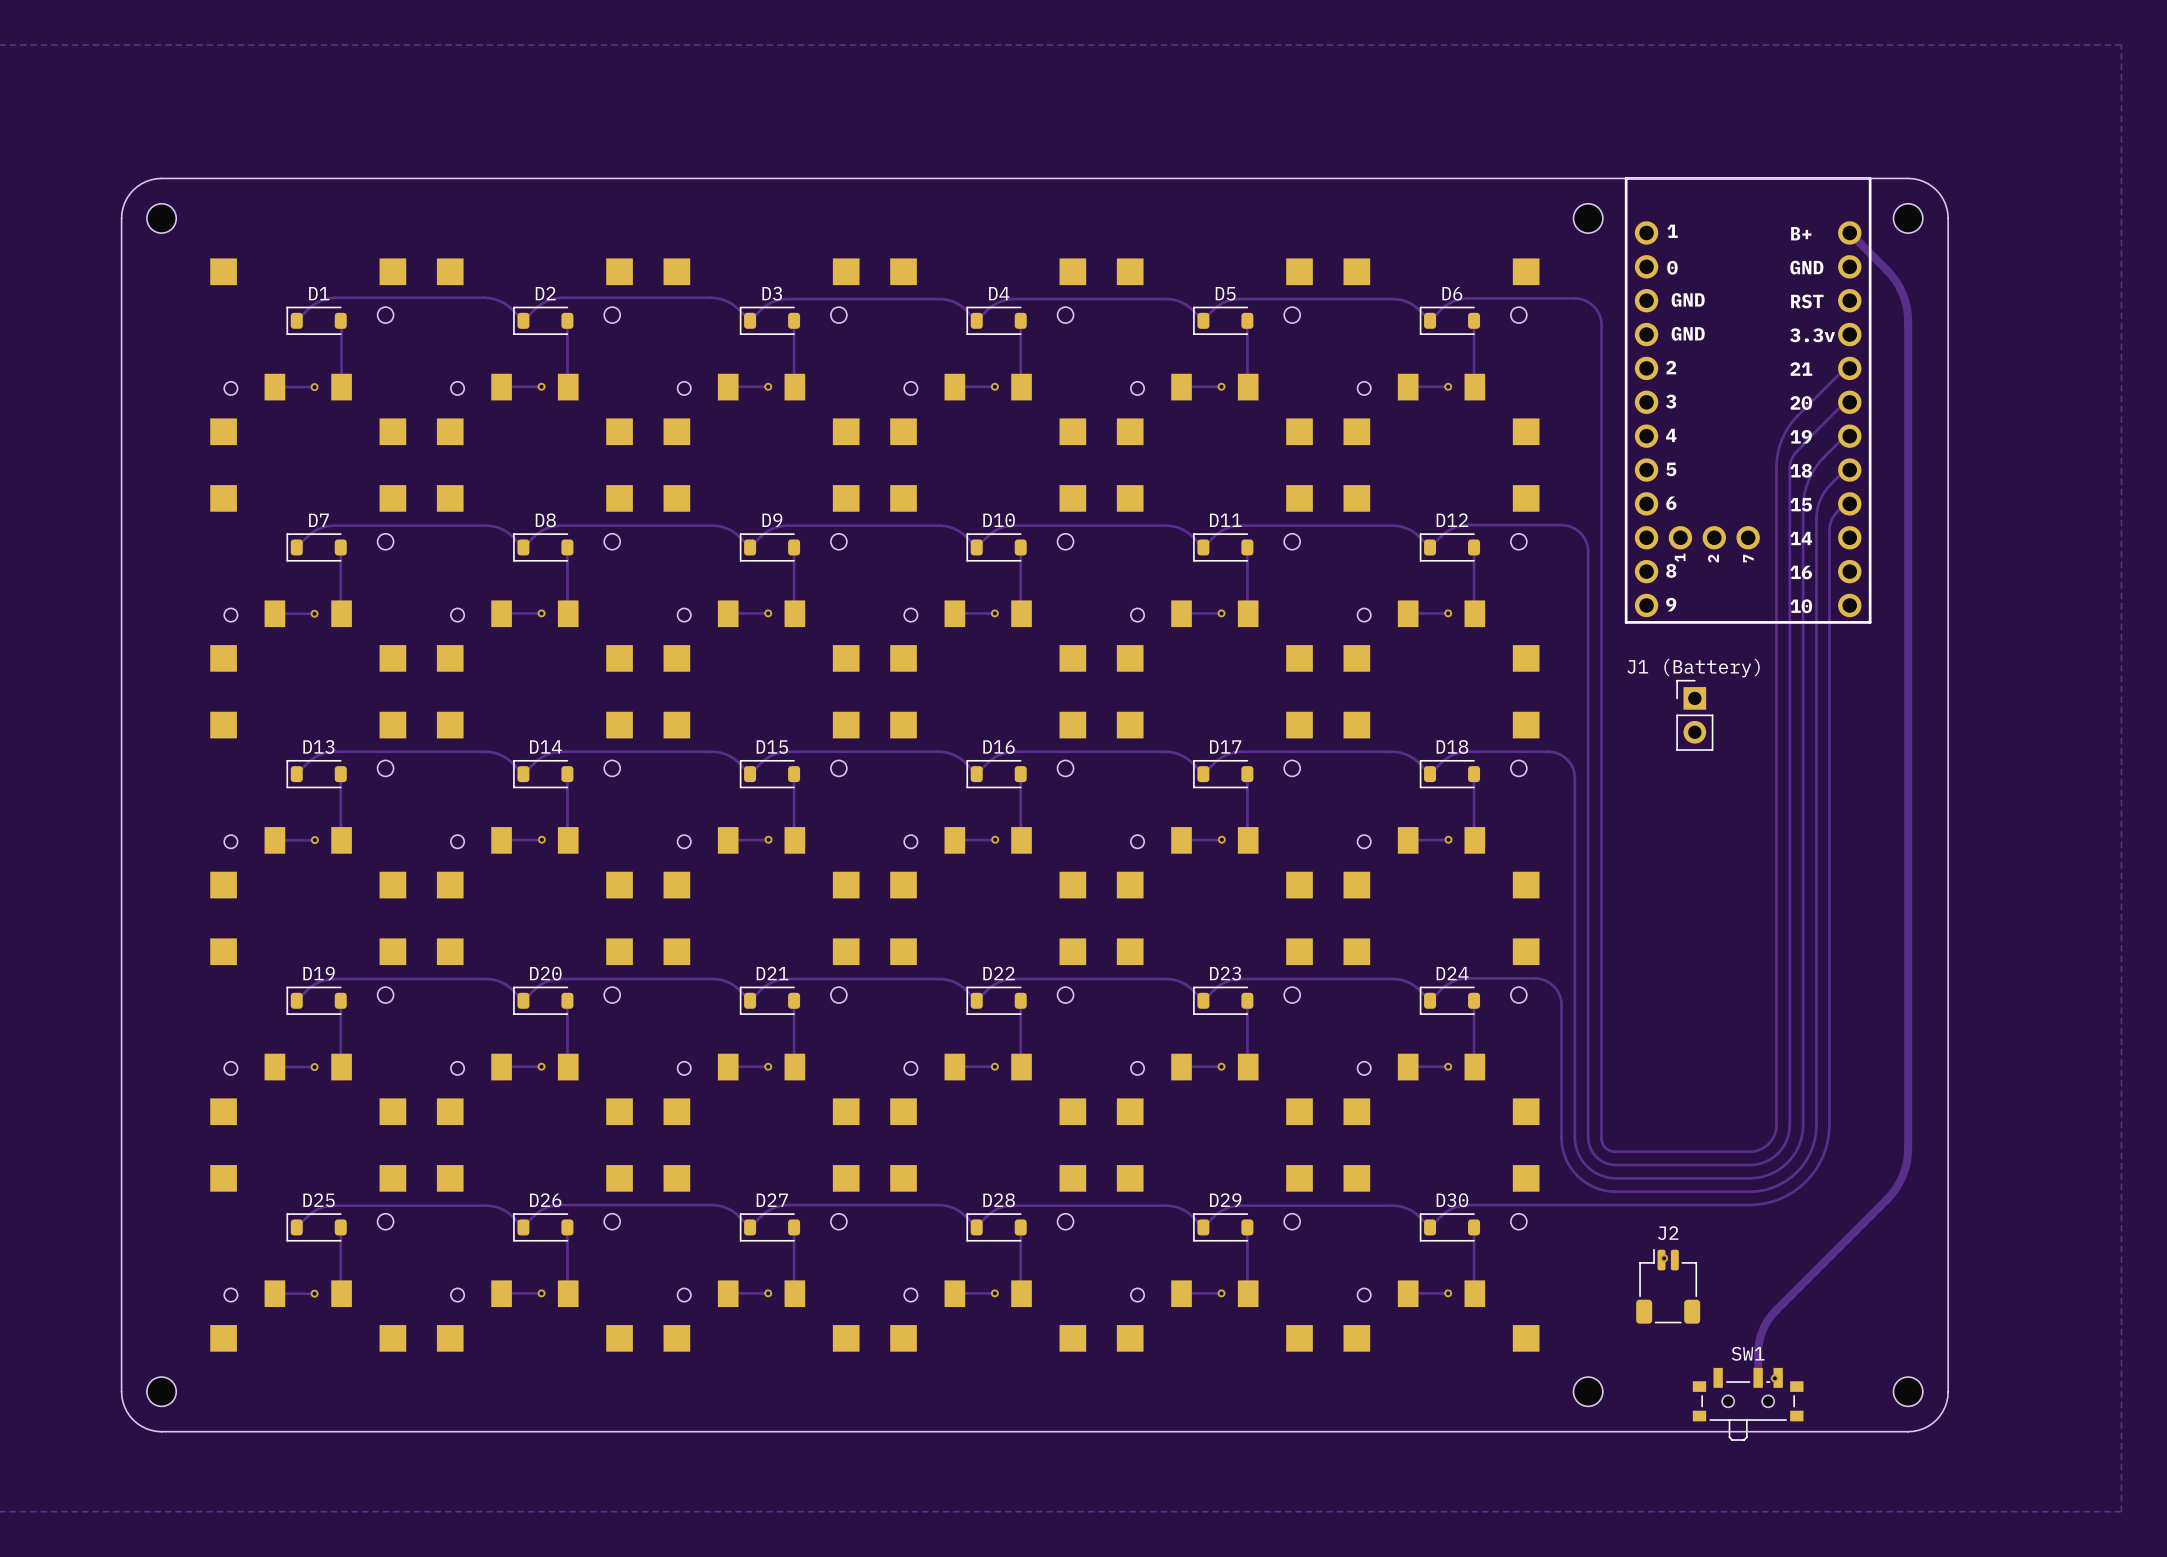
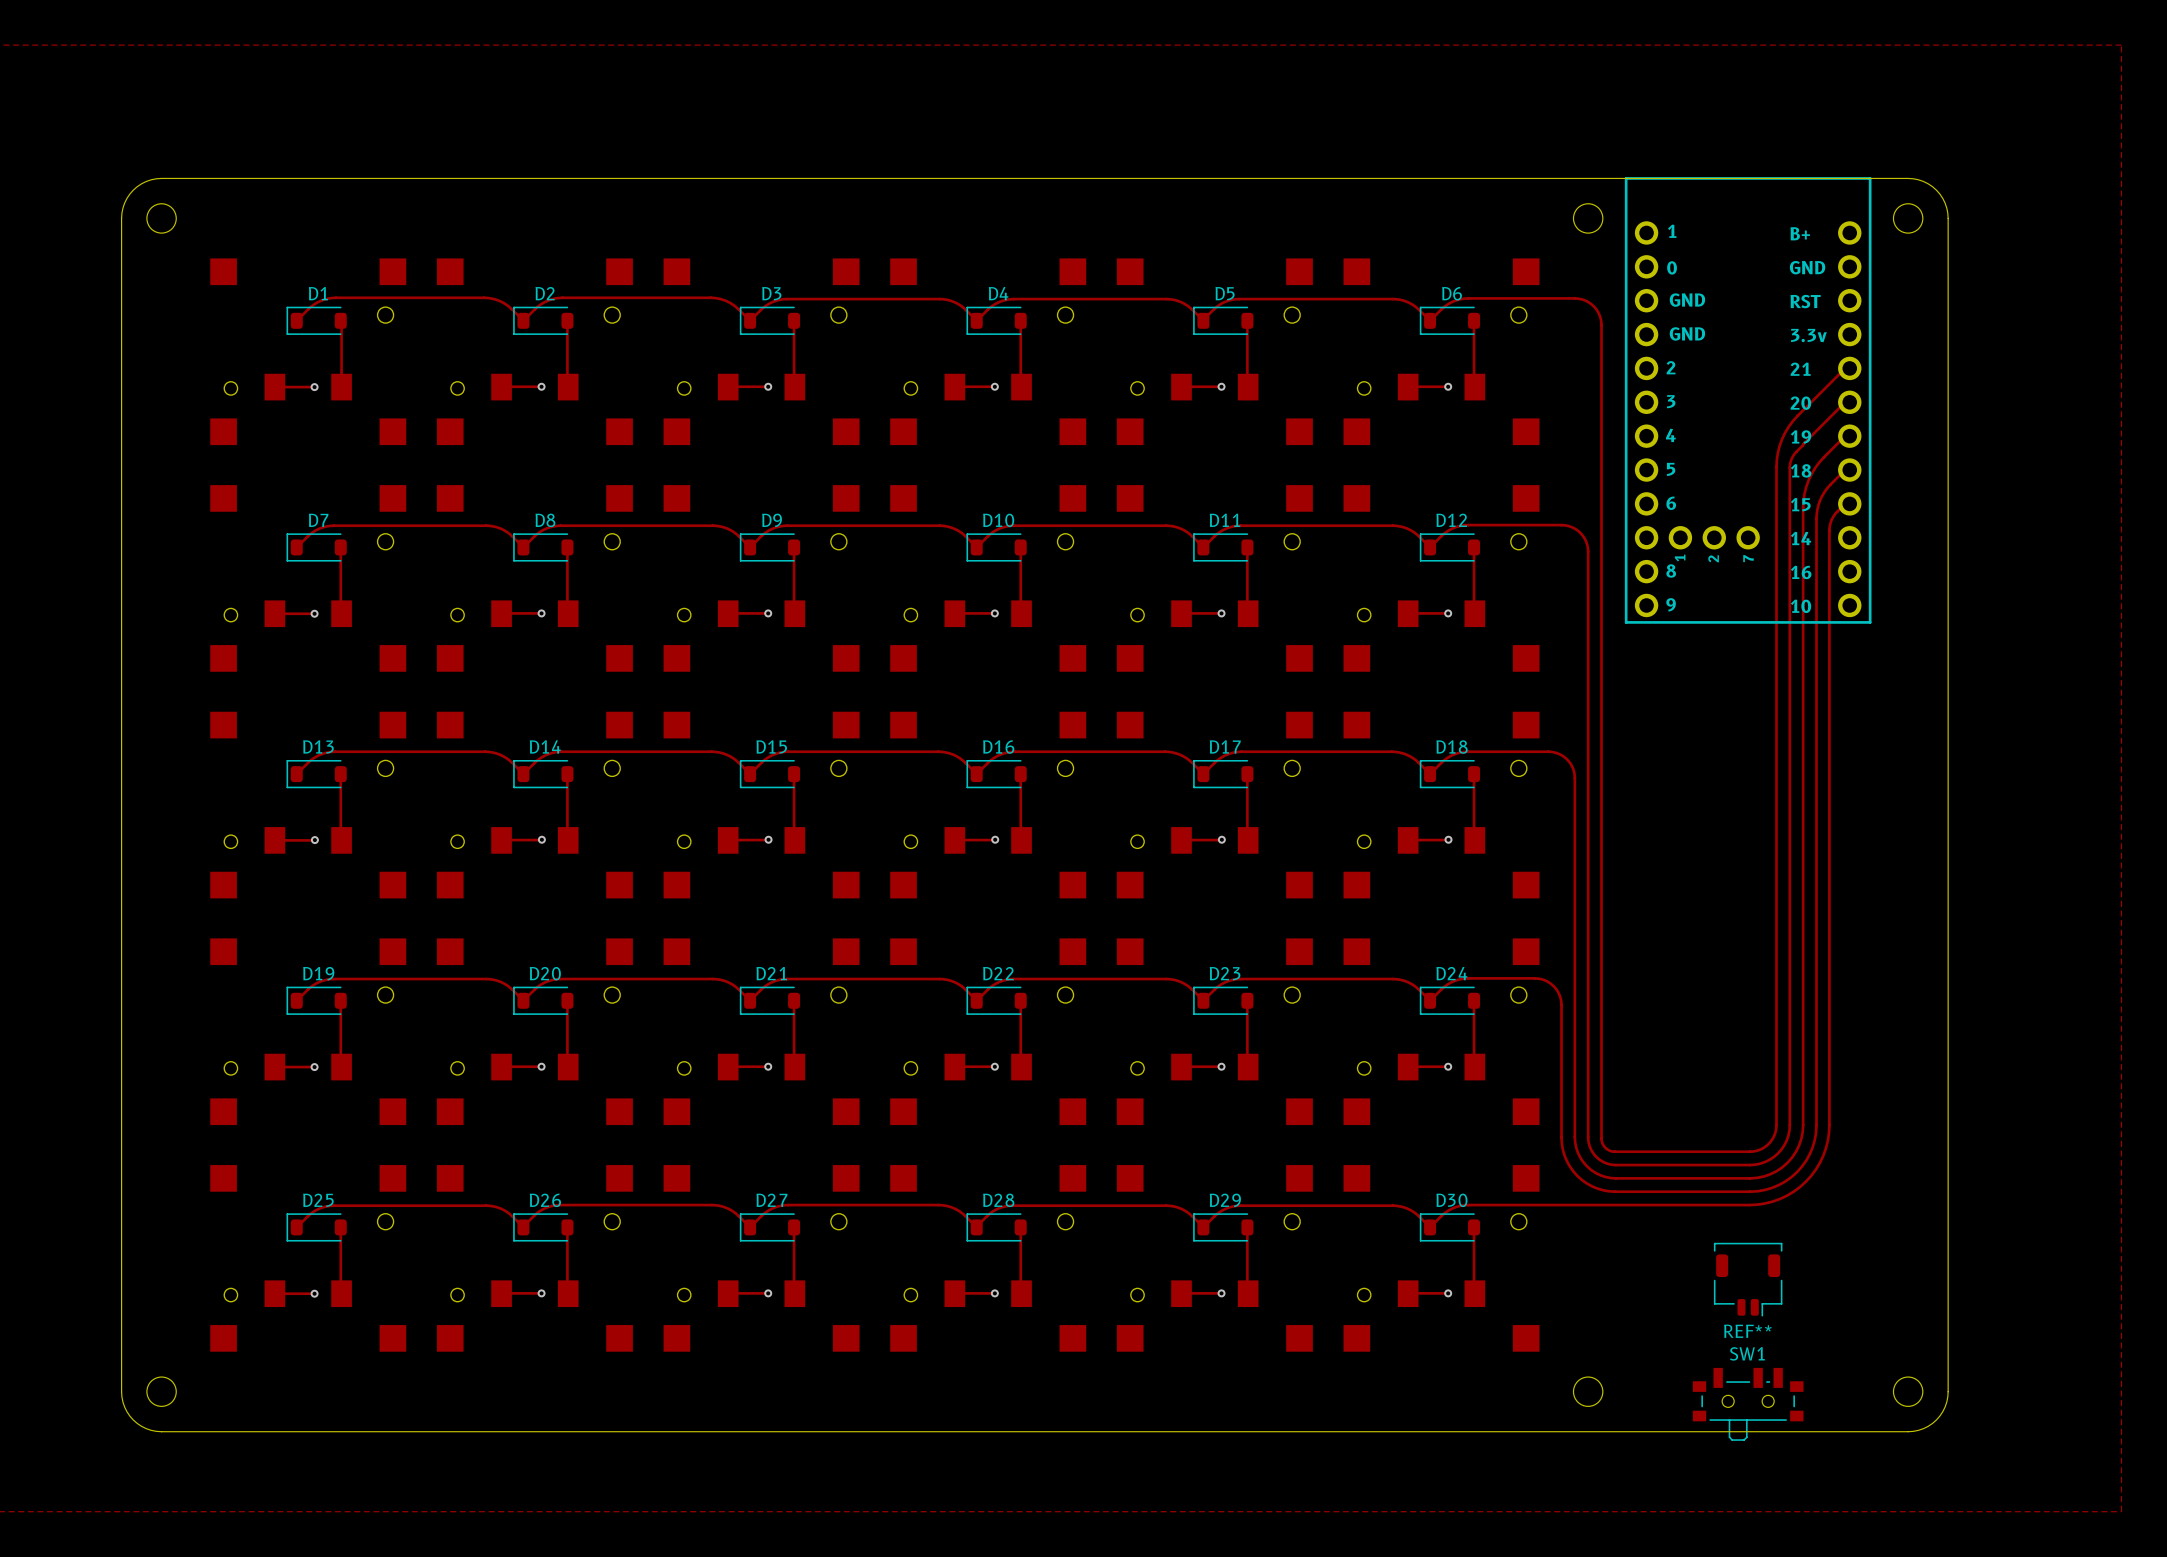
track: (1849, 232) (1895, 281) (1905, 300) (1907, 314) (1907, 1155) (1902, 1176) (1891, 1194) (1768, 1319) (1759, 1341) (1758, 1377) -> none
J1 (Battery): (1694, 715) -> none
via: (1664, 1258) -> none
REF**: none -> (1748, 1279)
J2: (1668, 1286) -> none
via: (1774, 1378) -> none

